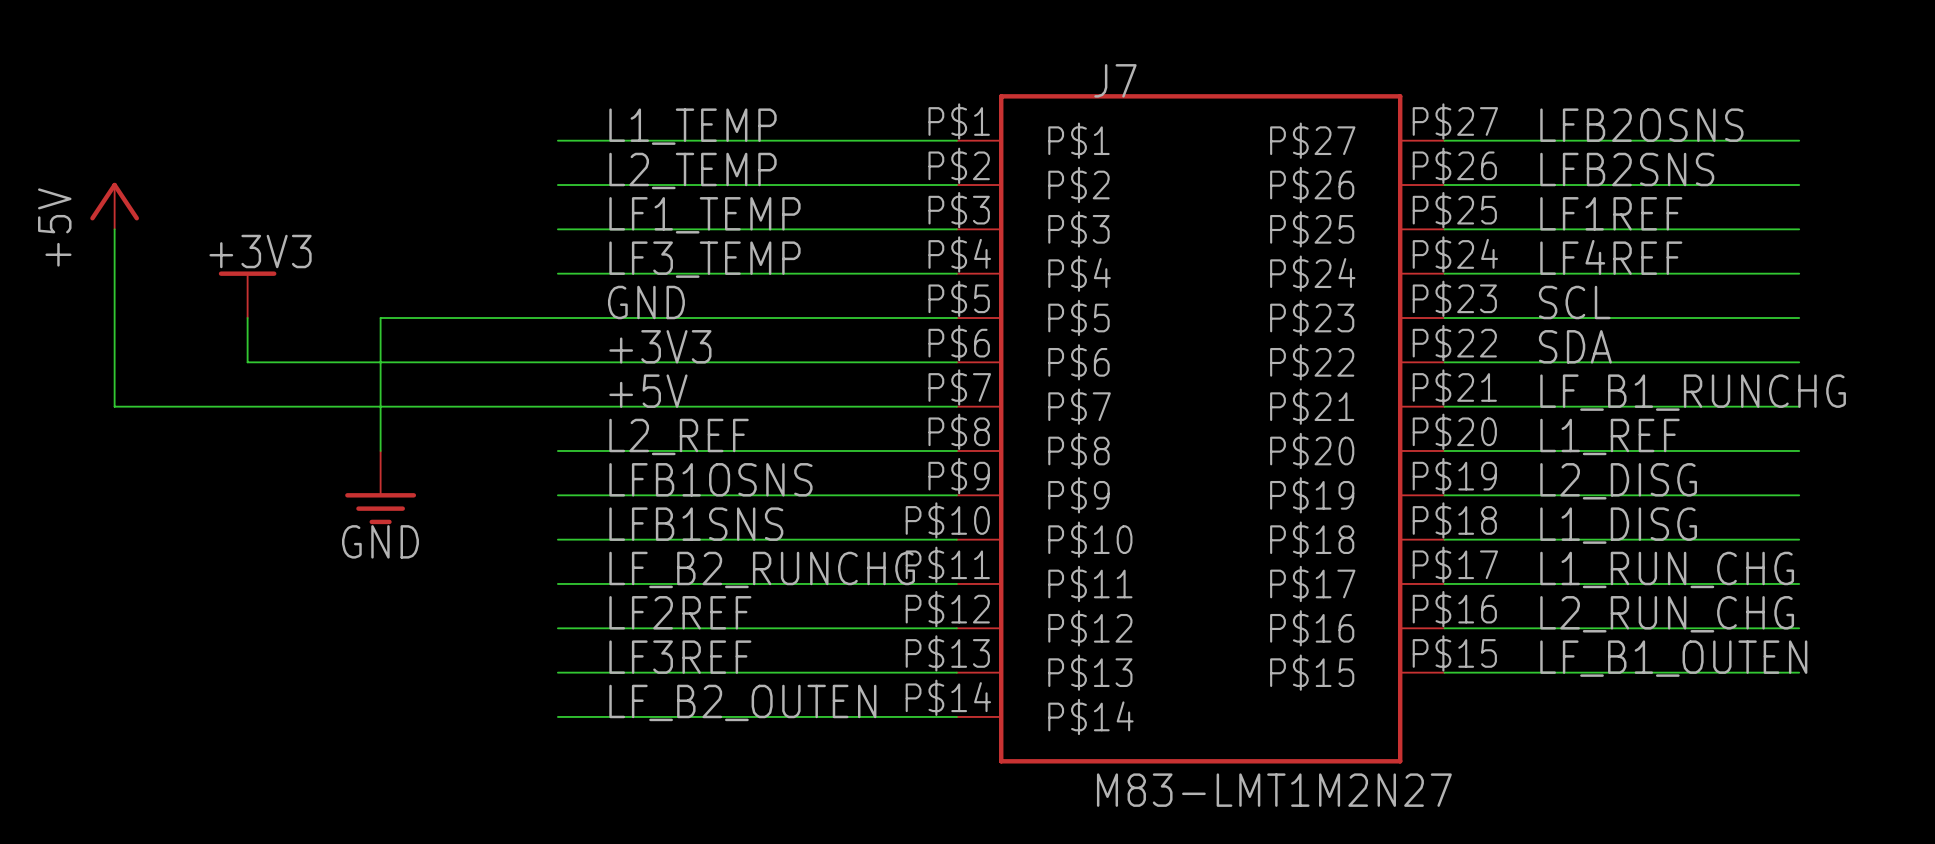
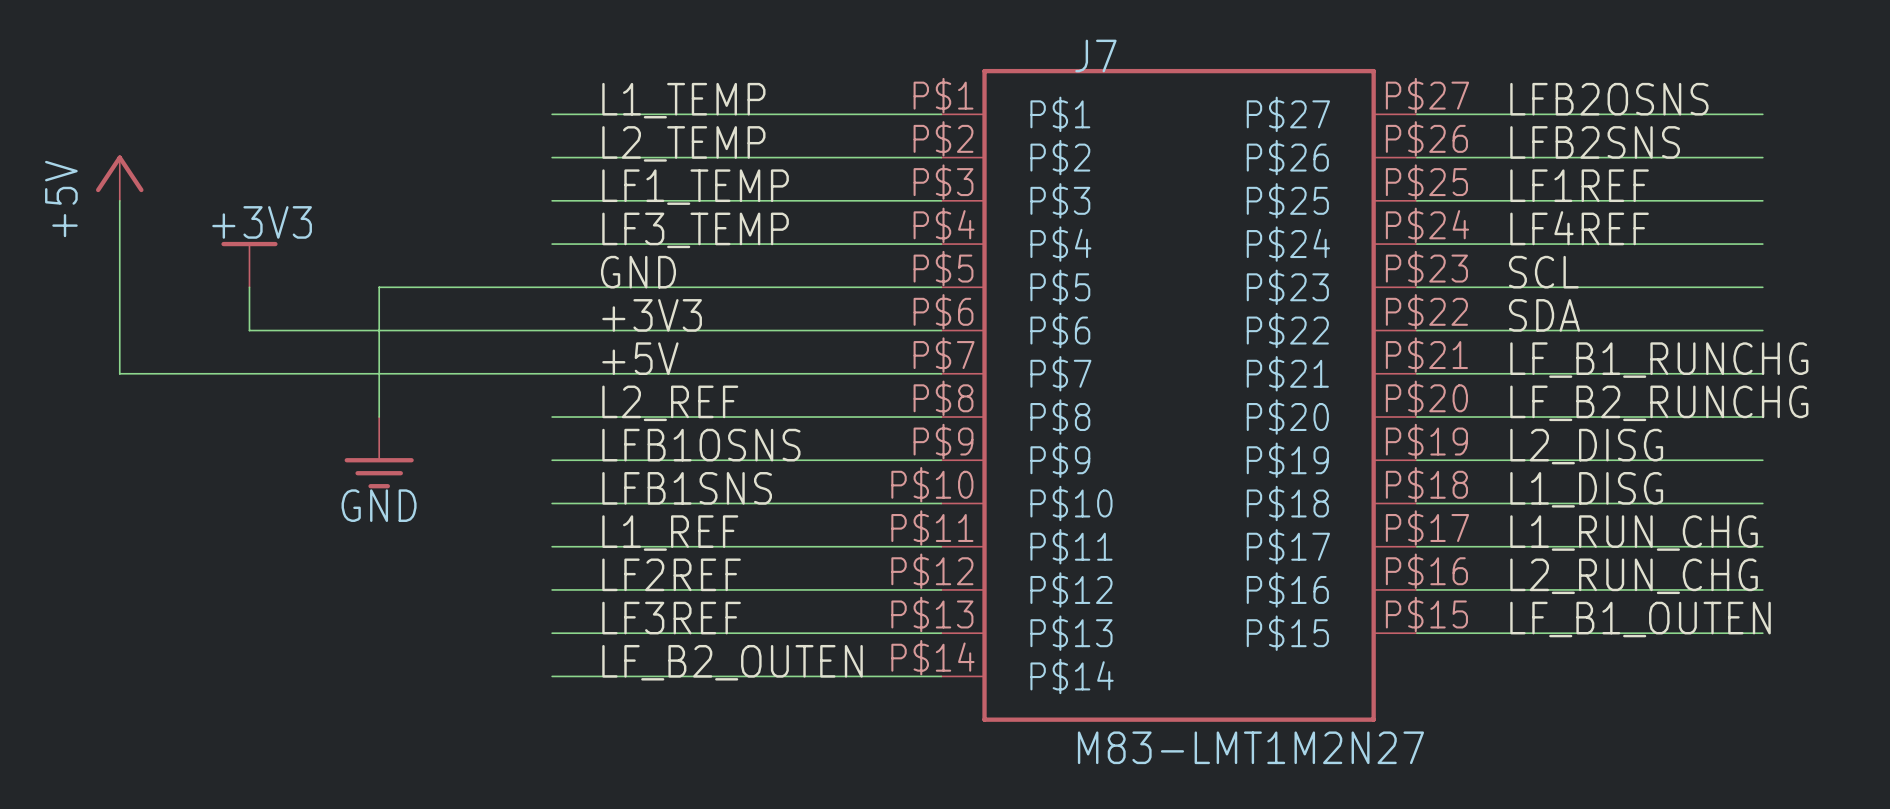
label: L1_REF (1609, 436) -> LF_B2_RUNCHG (1659, 403)
label: LF_B2_RUNCHG (762, 569) -> L1_REF (670, 533)

